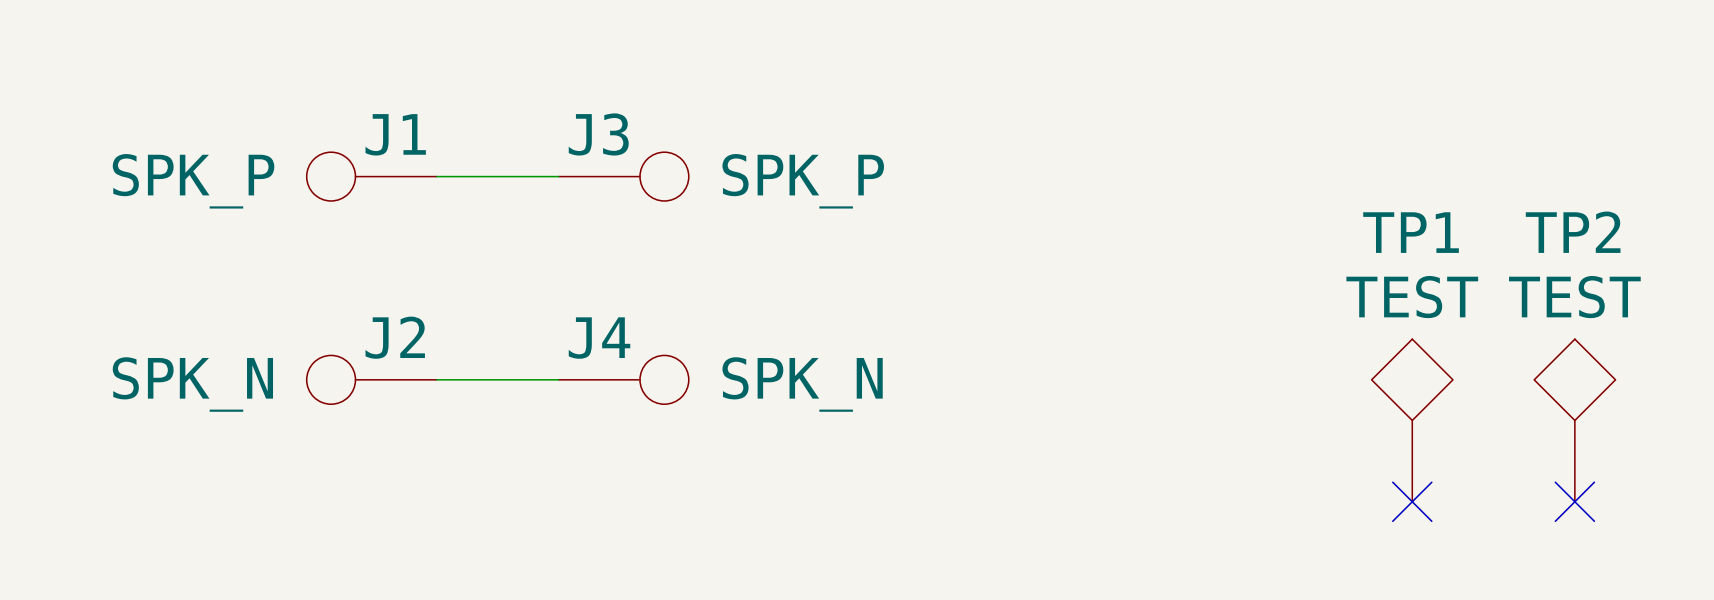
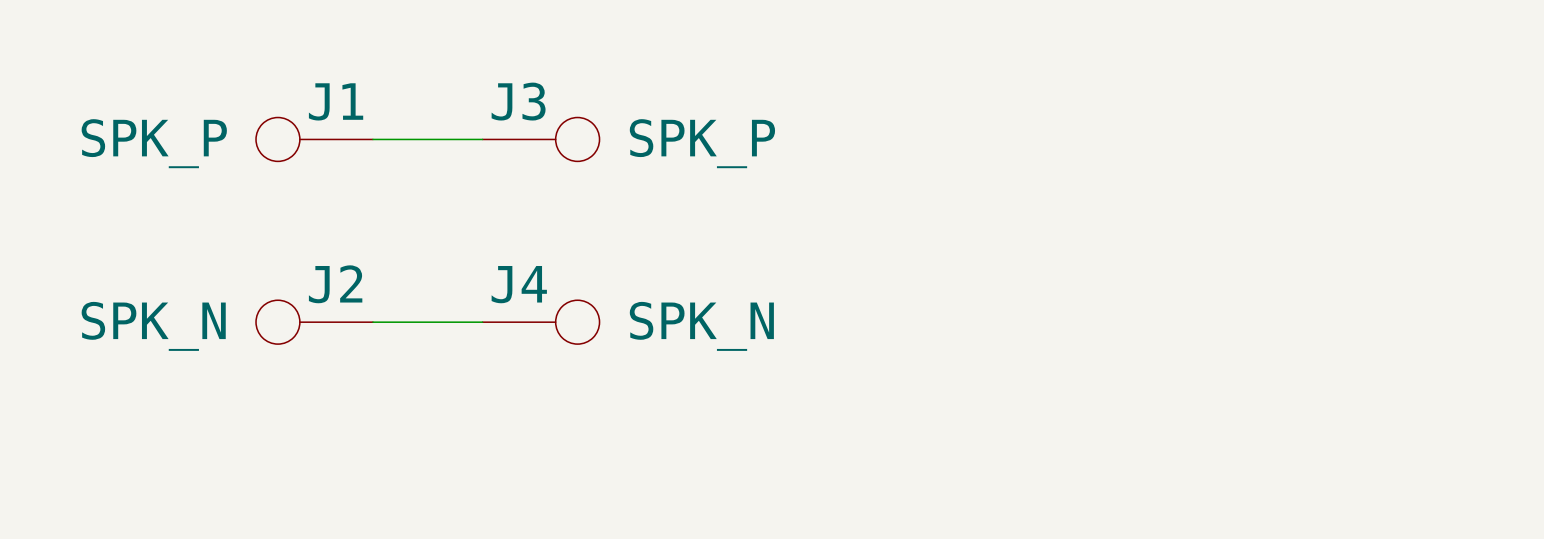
TP1: TEST (1412, 420) -> none
TP2: TEST (1574, 420) -> none
no-connect mark: (1412, 501) -> none
no-connect mark: (1574, 501) -> none

